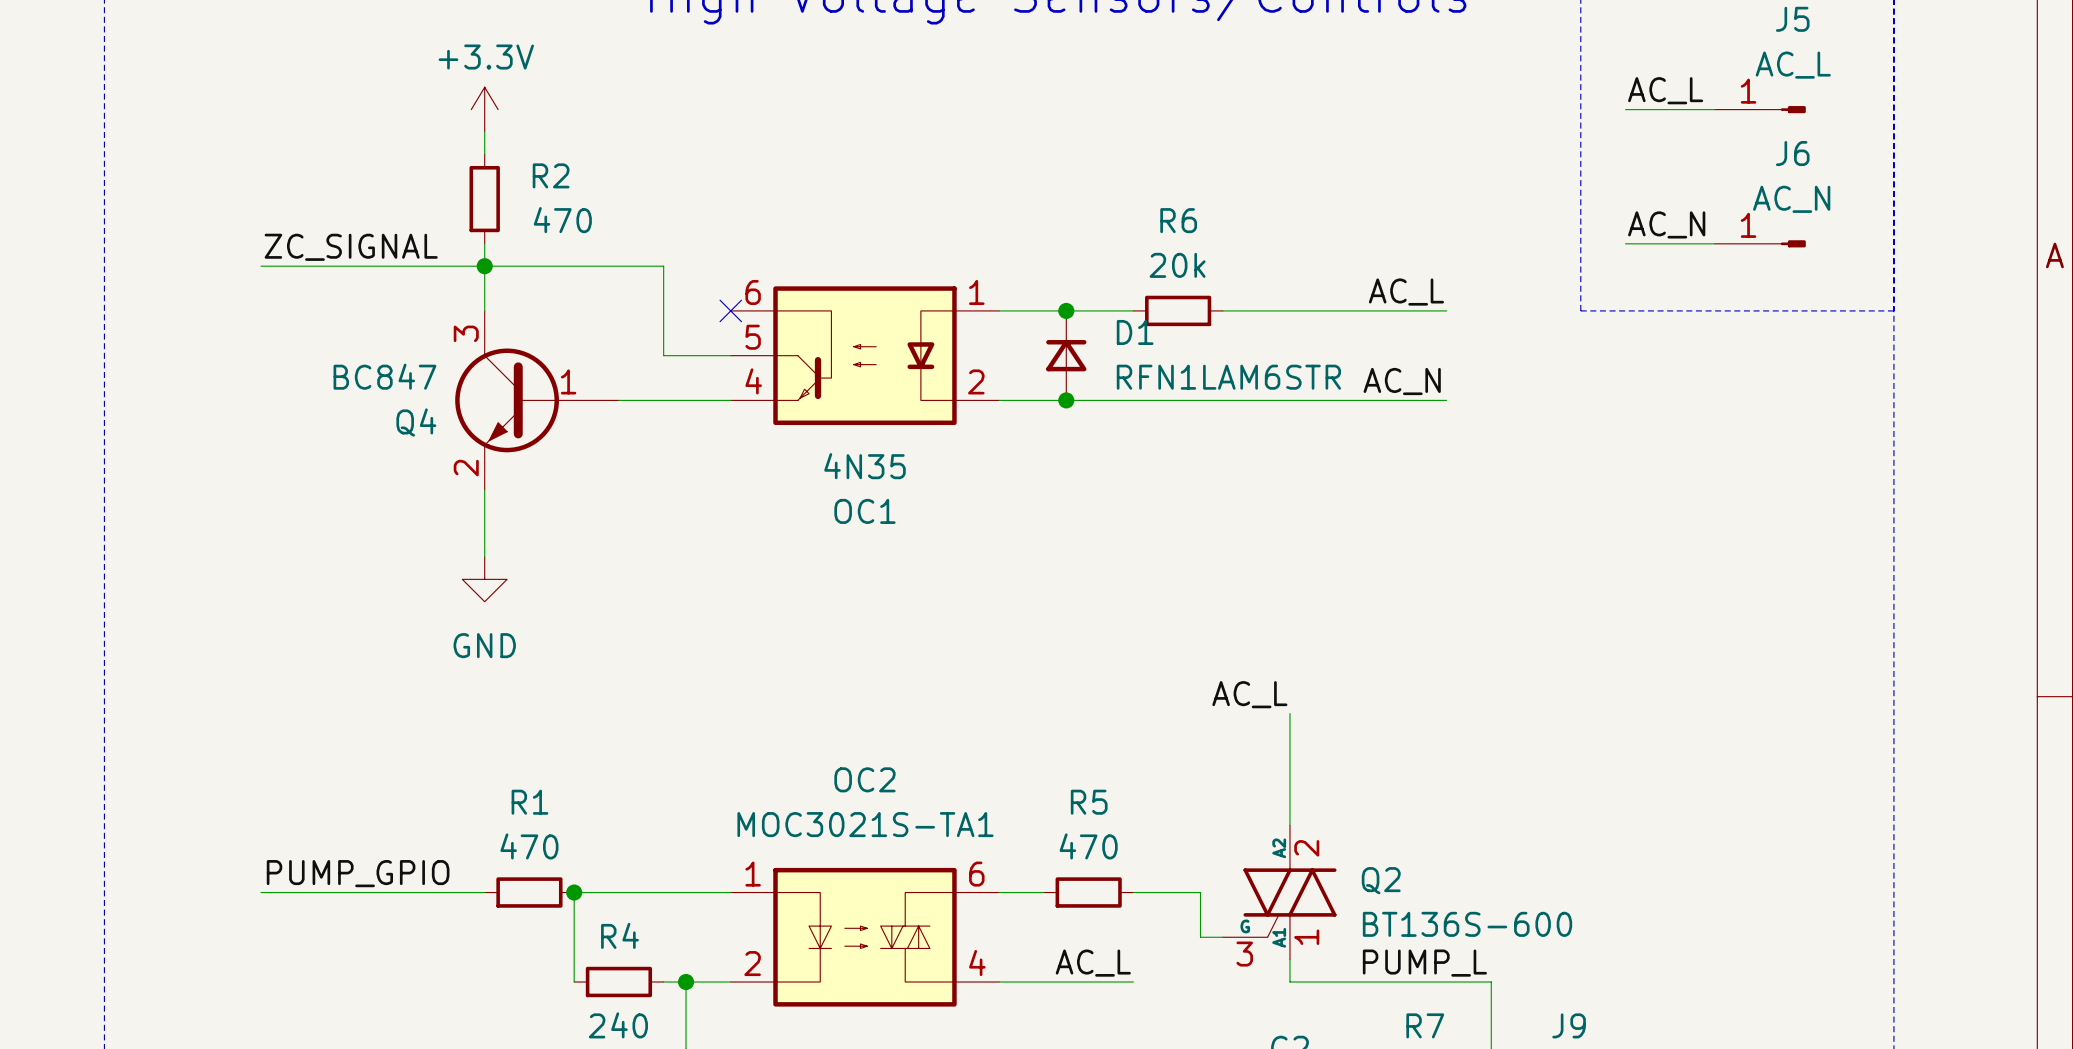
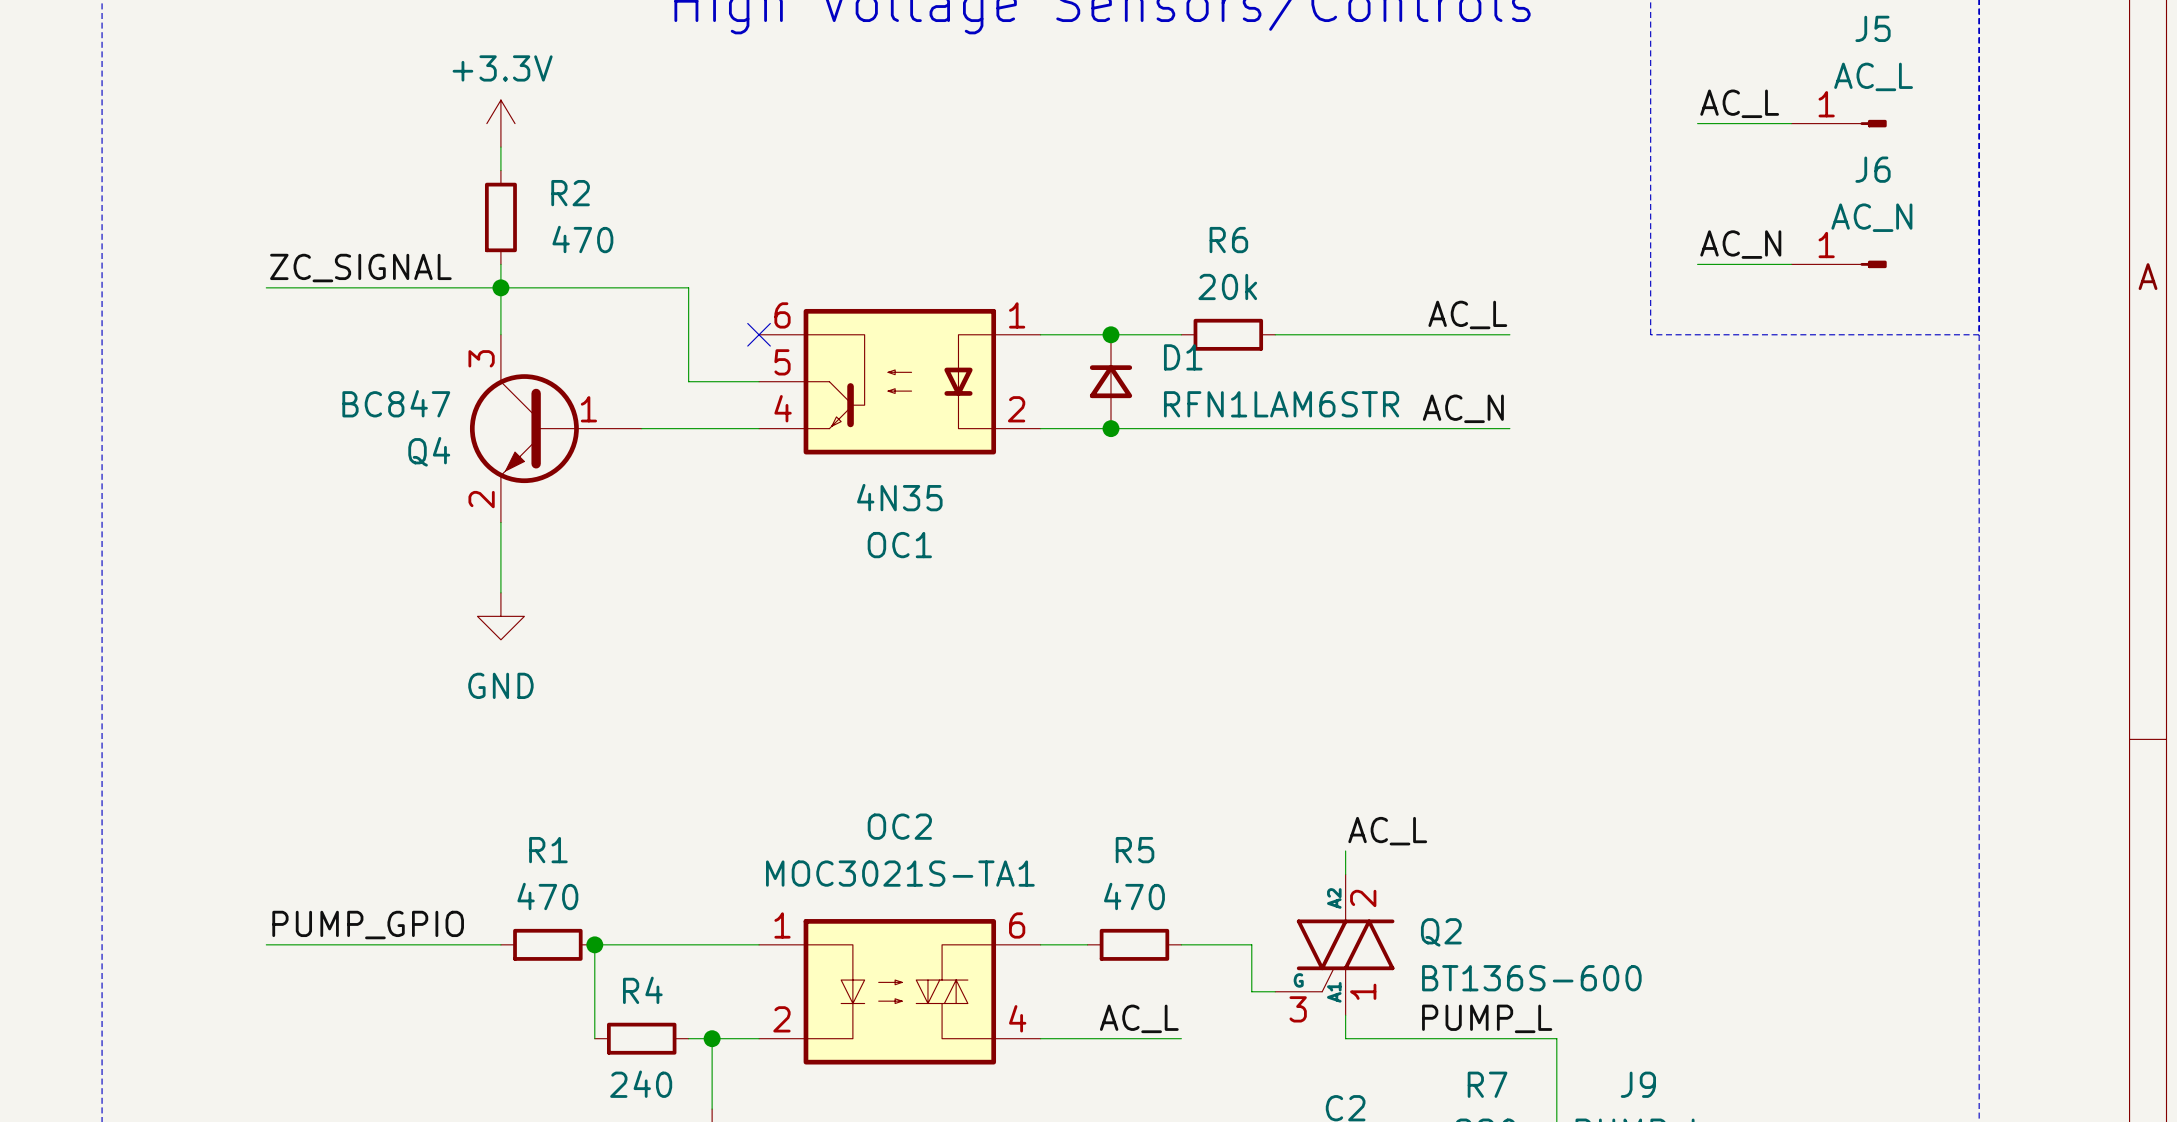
label position: AC_L (1249, 694) -> AC_L (1387, 831)
wire: (1289, 713) (1289, 803) -> none

